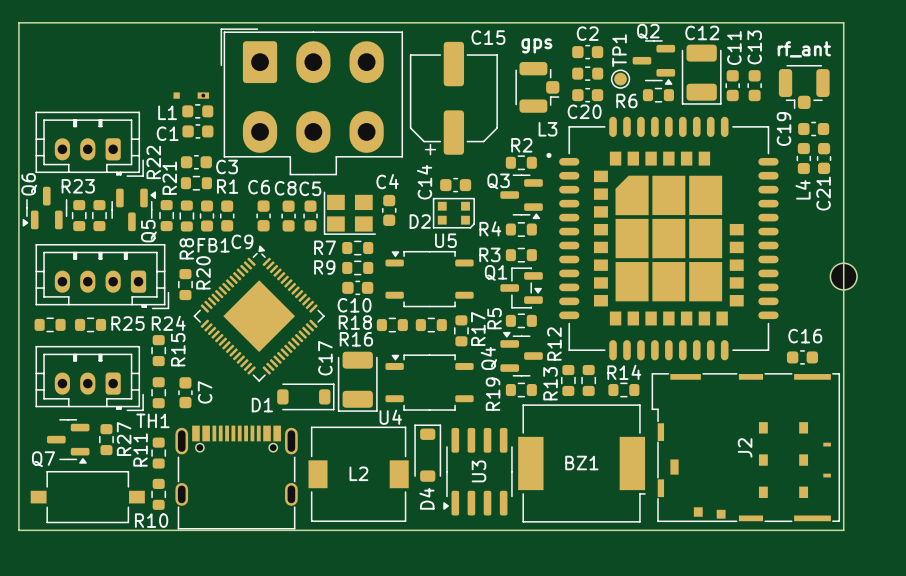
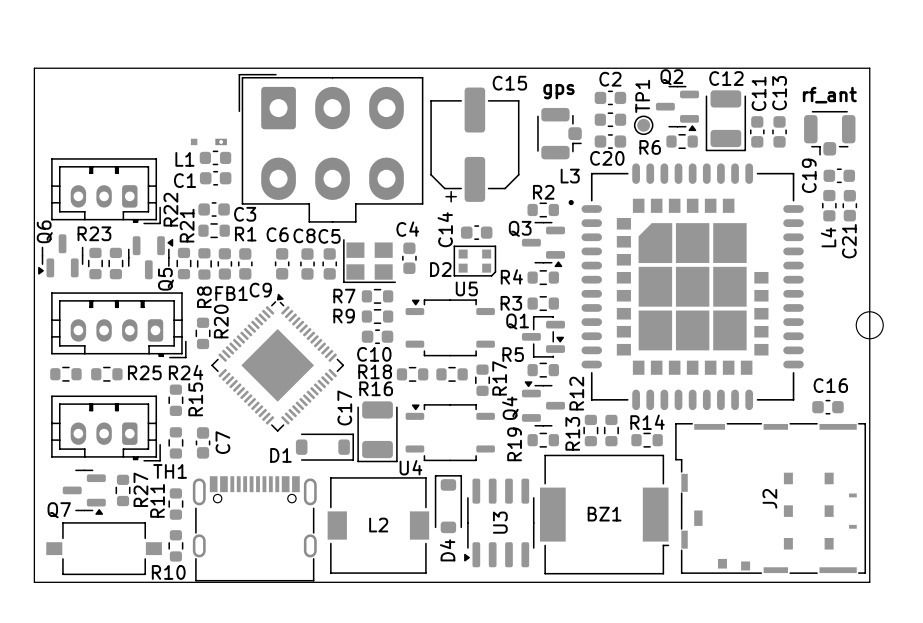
R5 name rotation: 0° (494, 318) -> 90° clockwise (513, 354)

